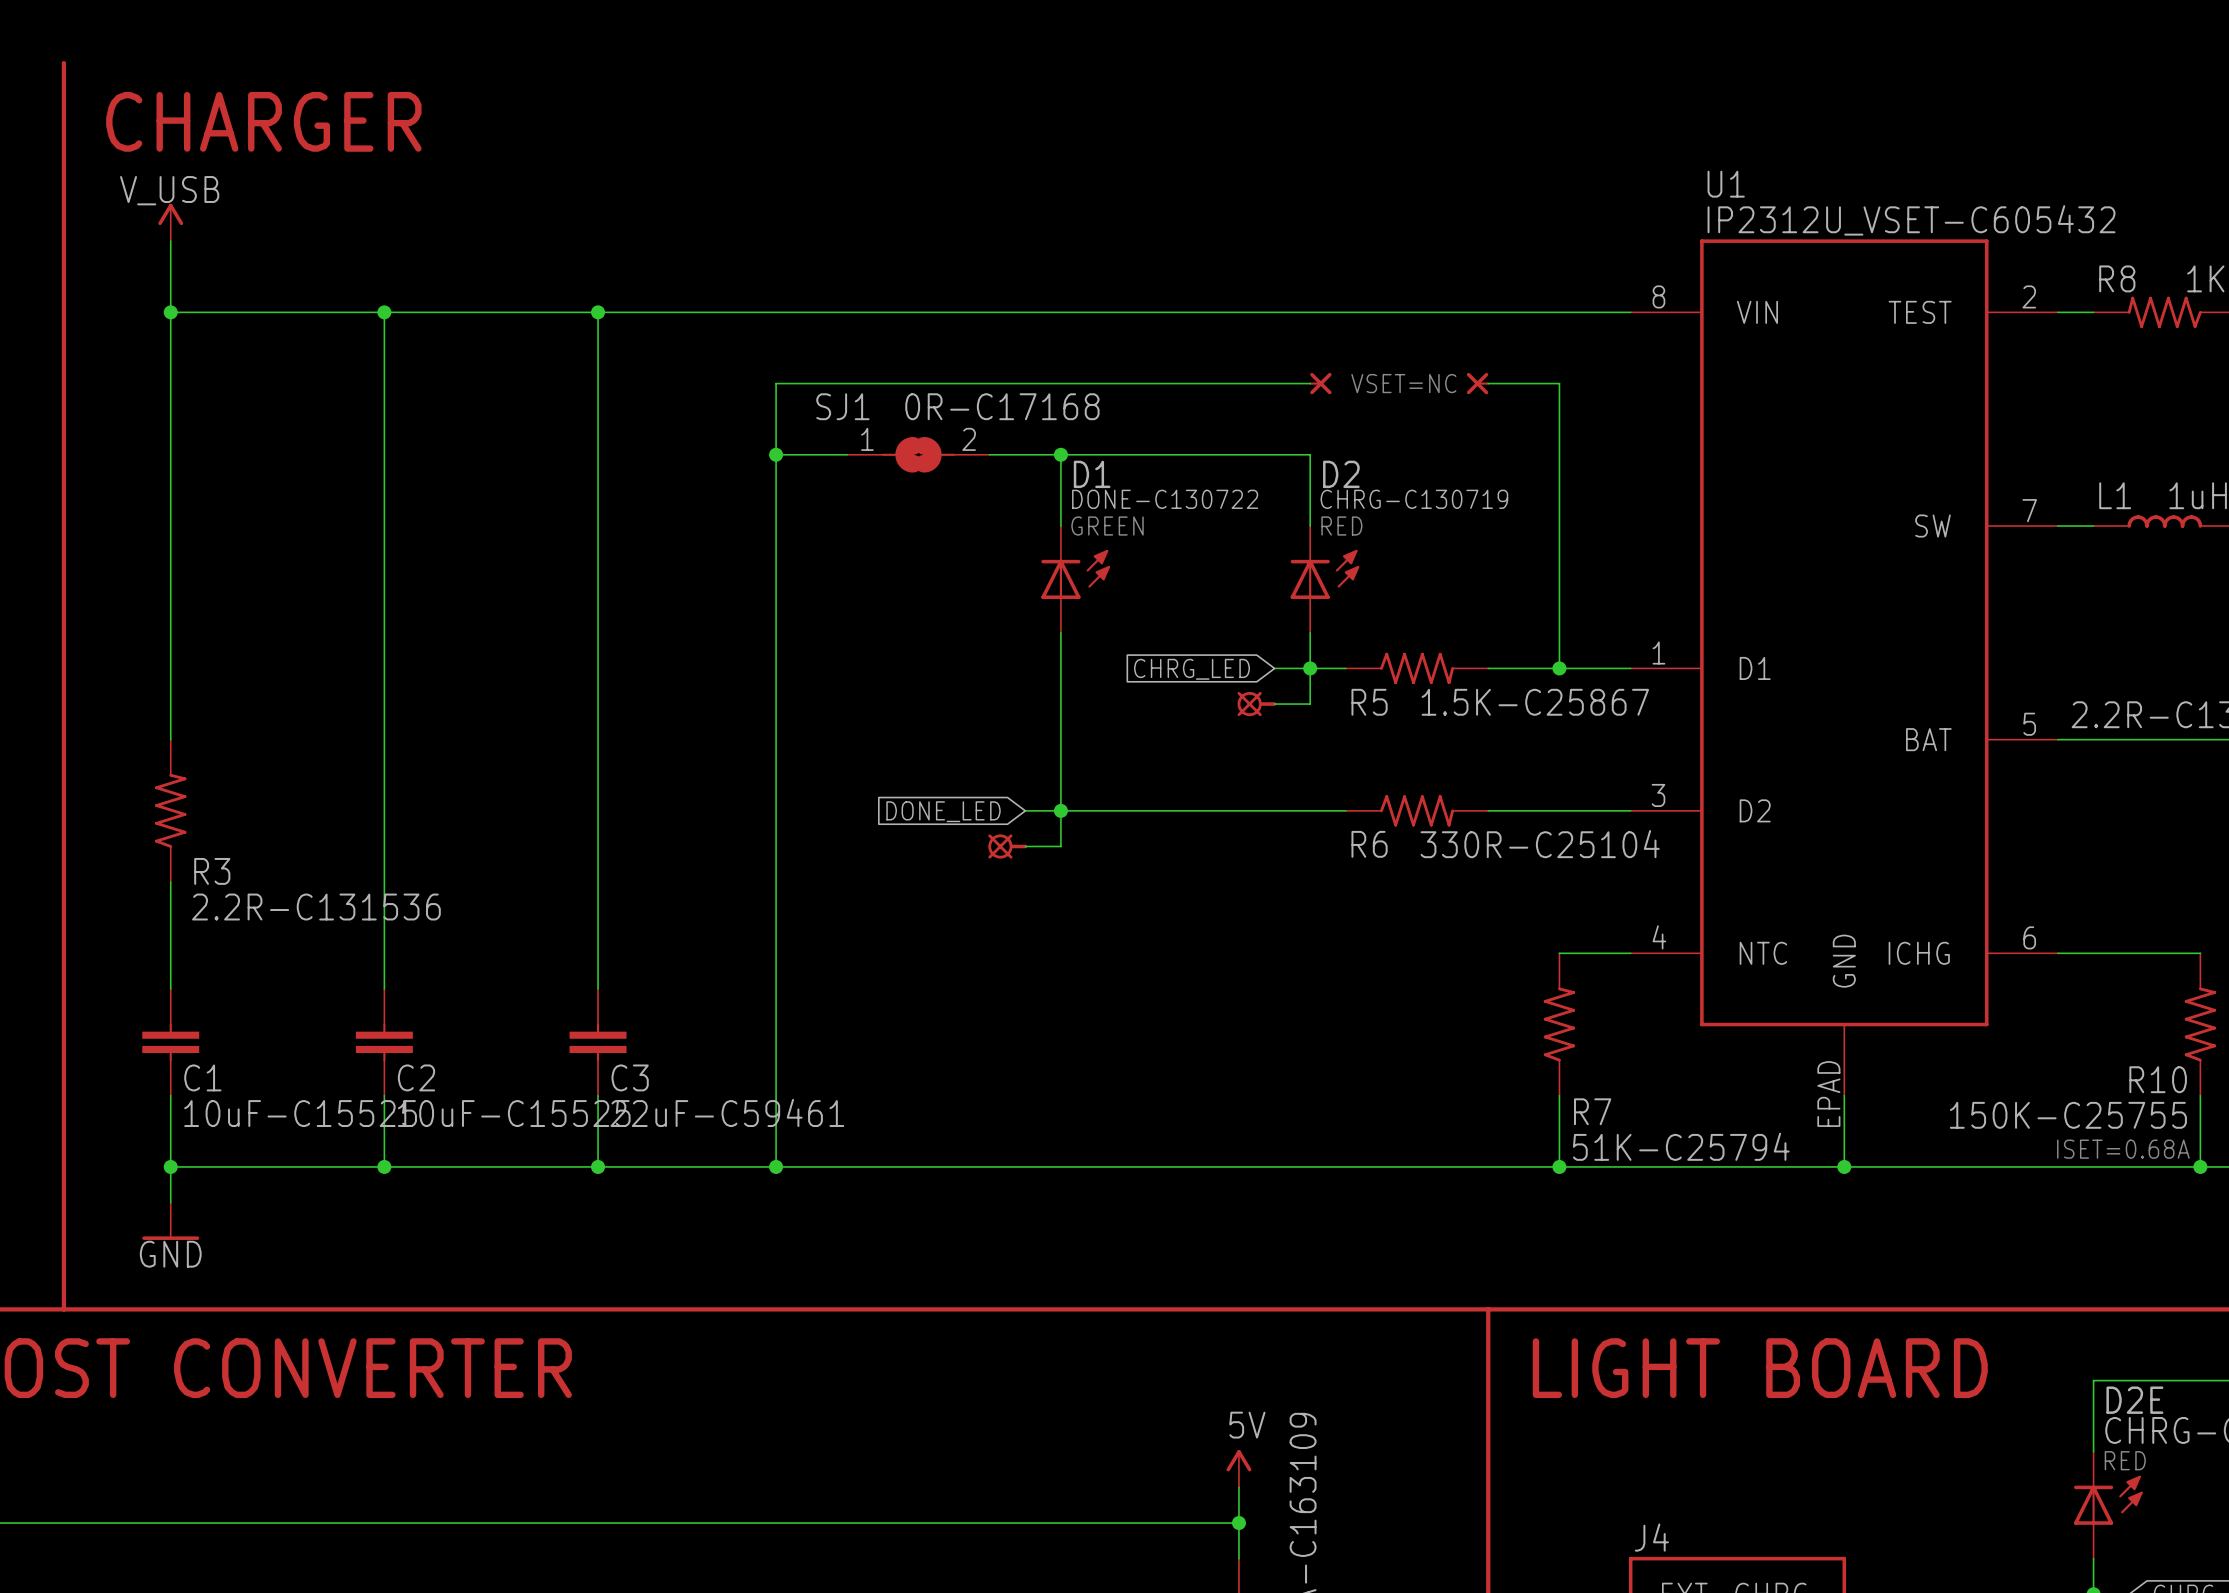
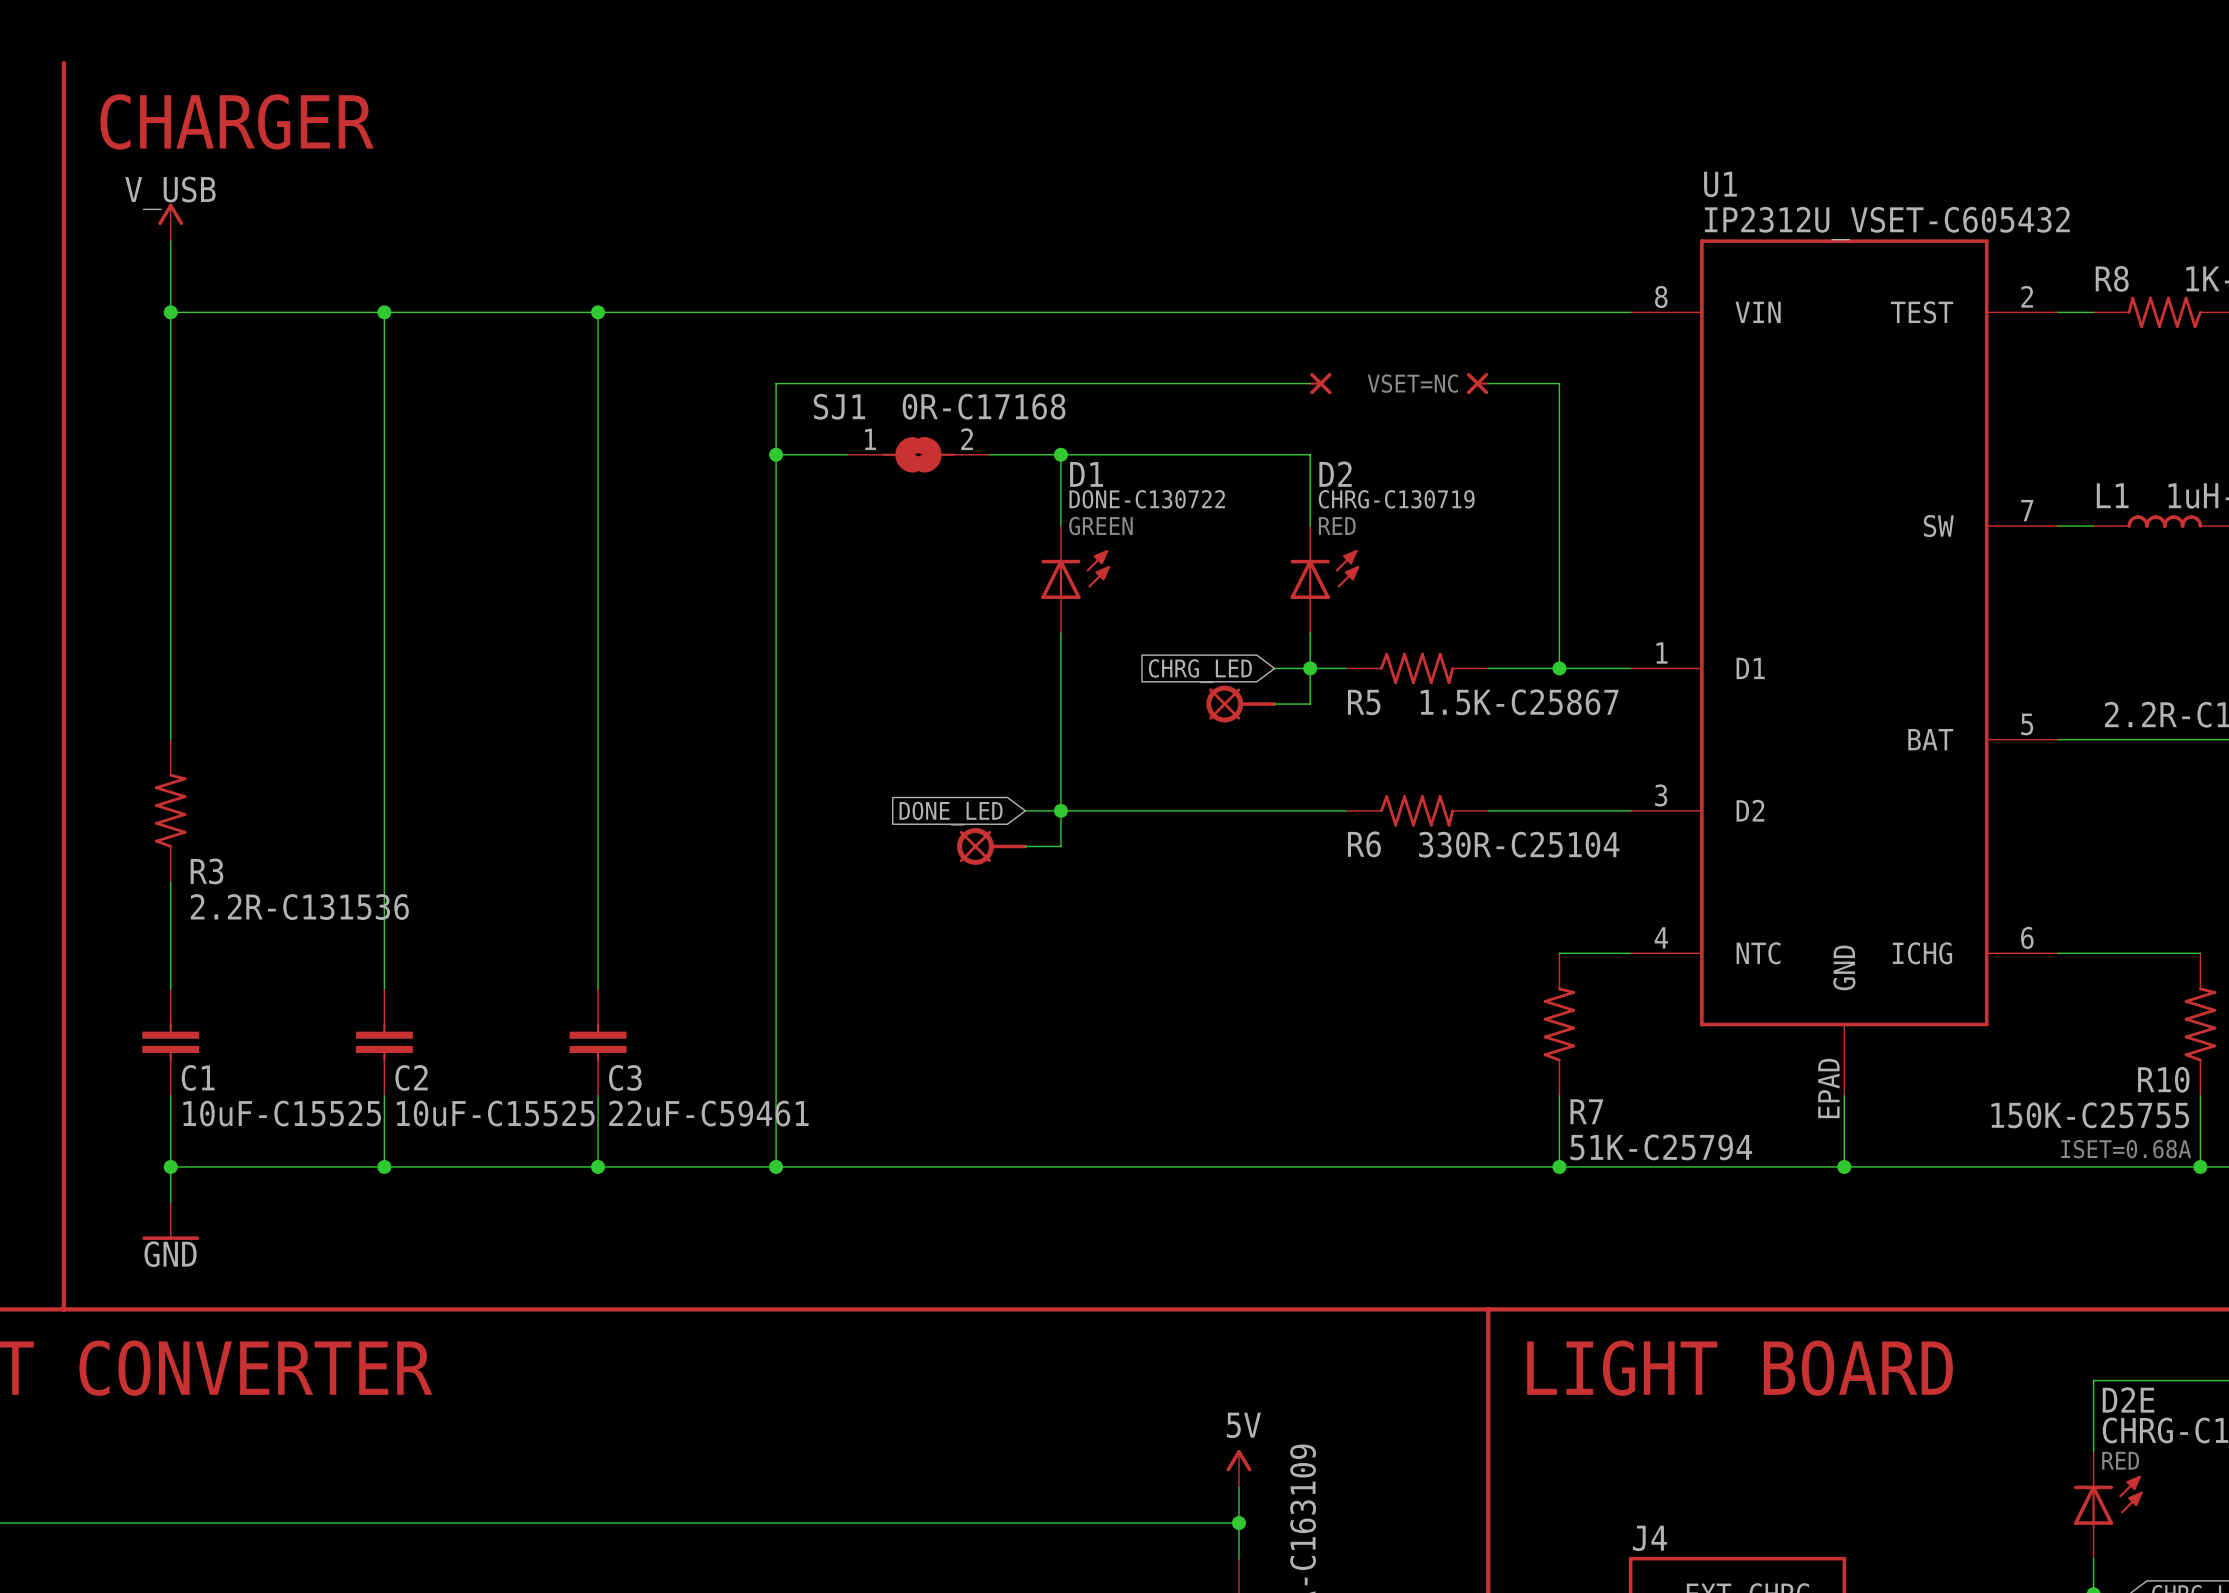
part: none -> (1241, 704)
part: (1256, 704) -> none
part: none -> (992, 846)
part: (1007, 846) -> none

